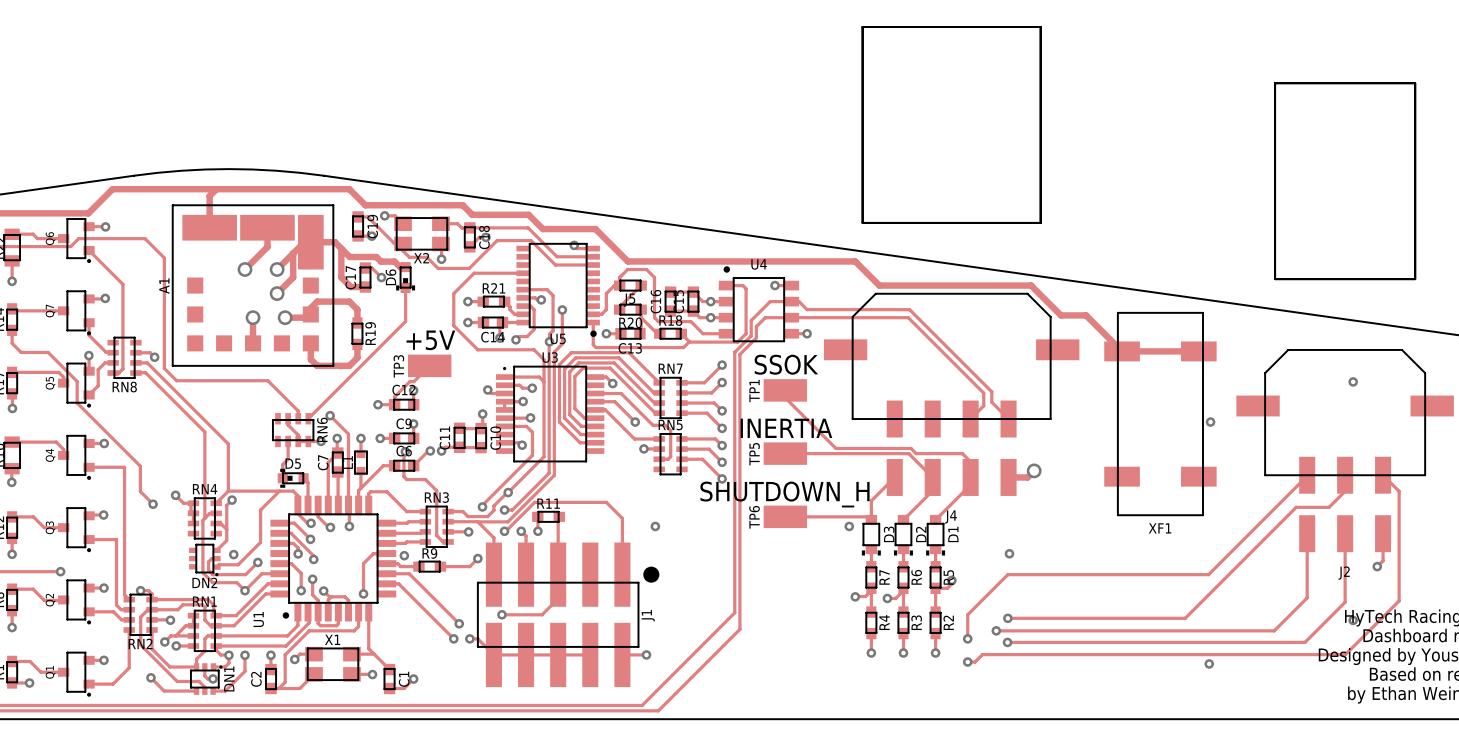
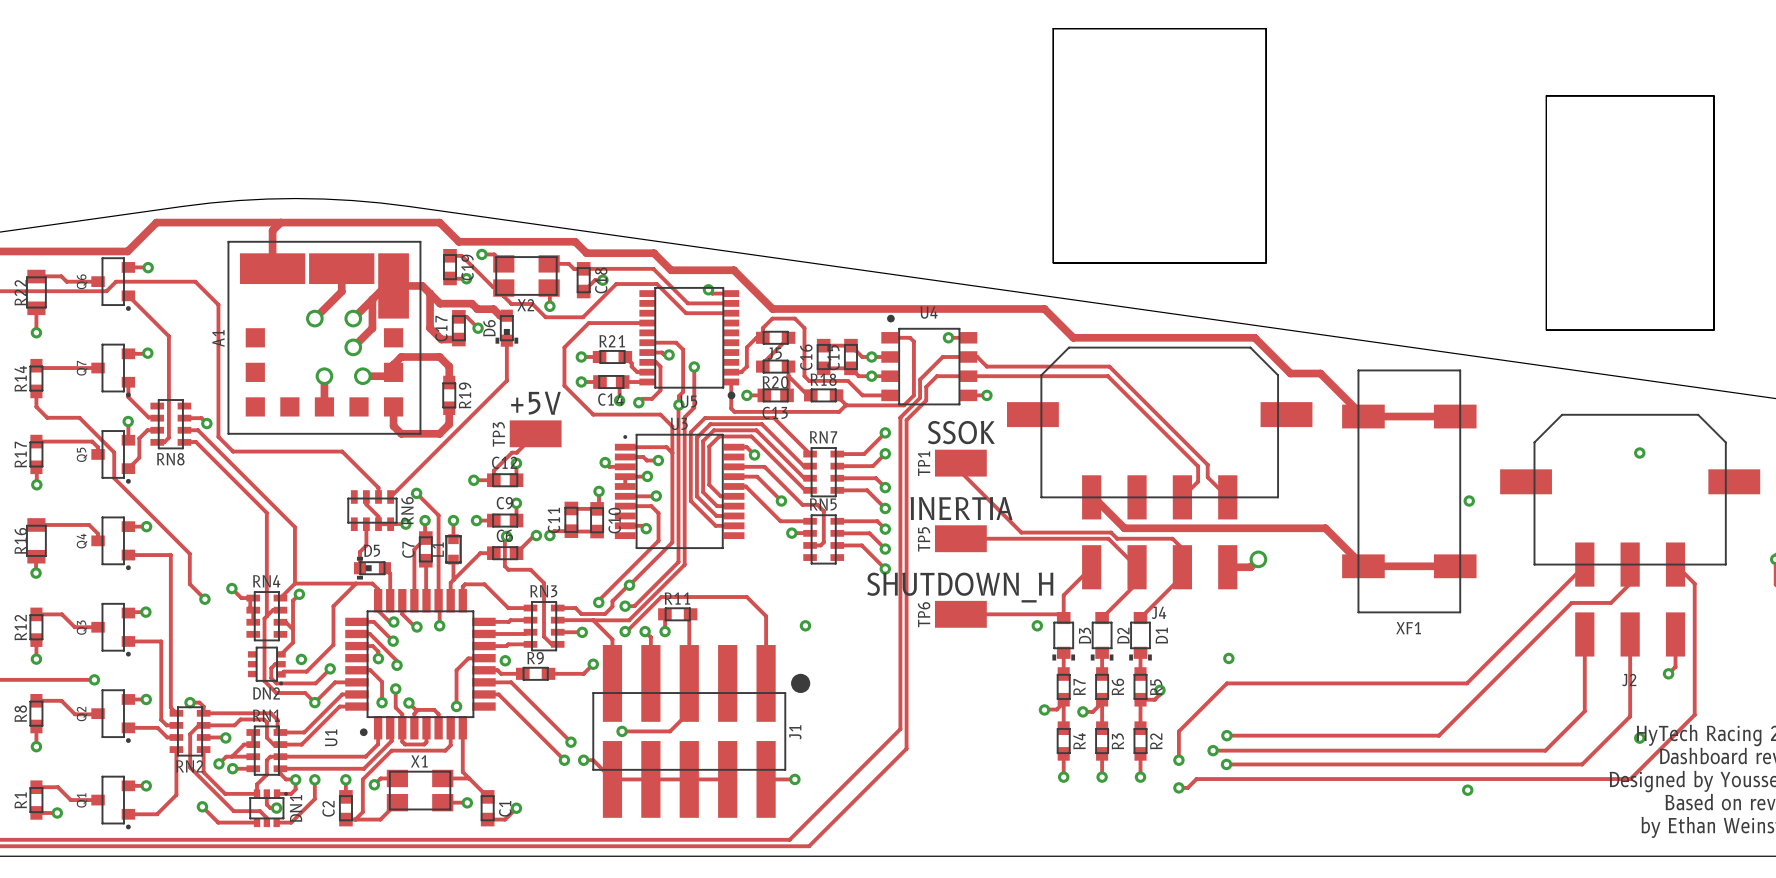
track: none -> (1091, 497) (1124, 528) (1325, 528) (1363, 566) (1455, 566)

